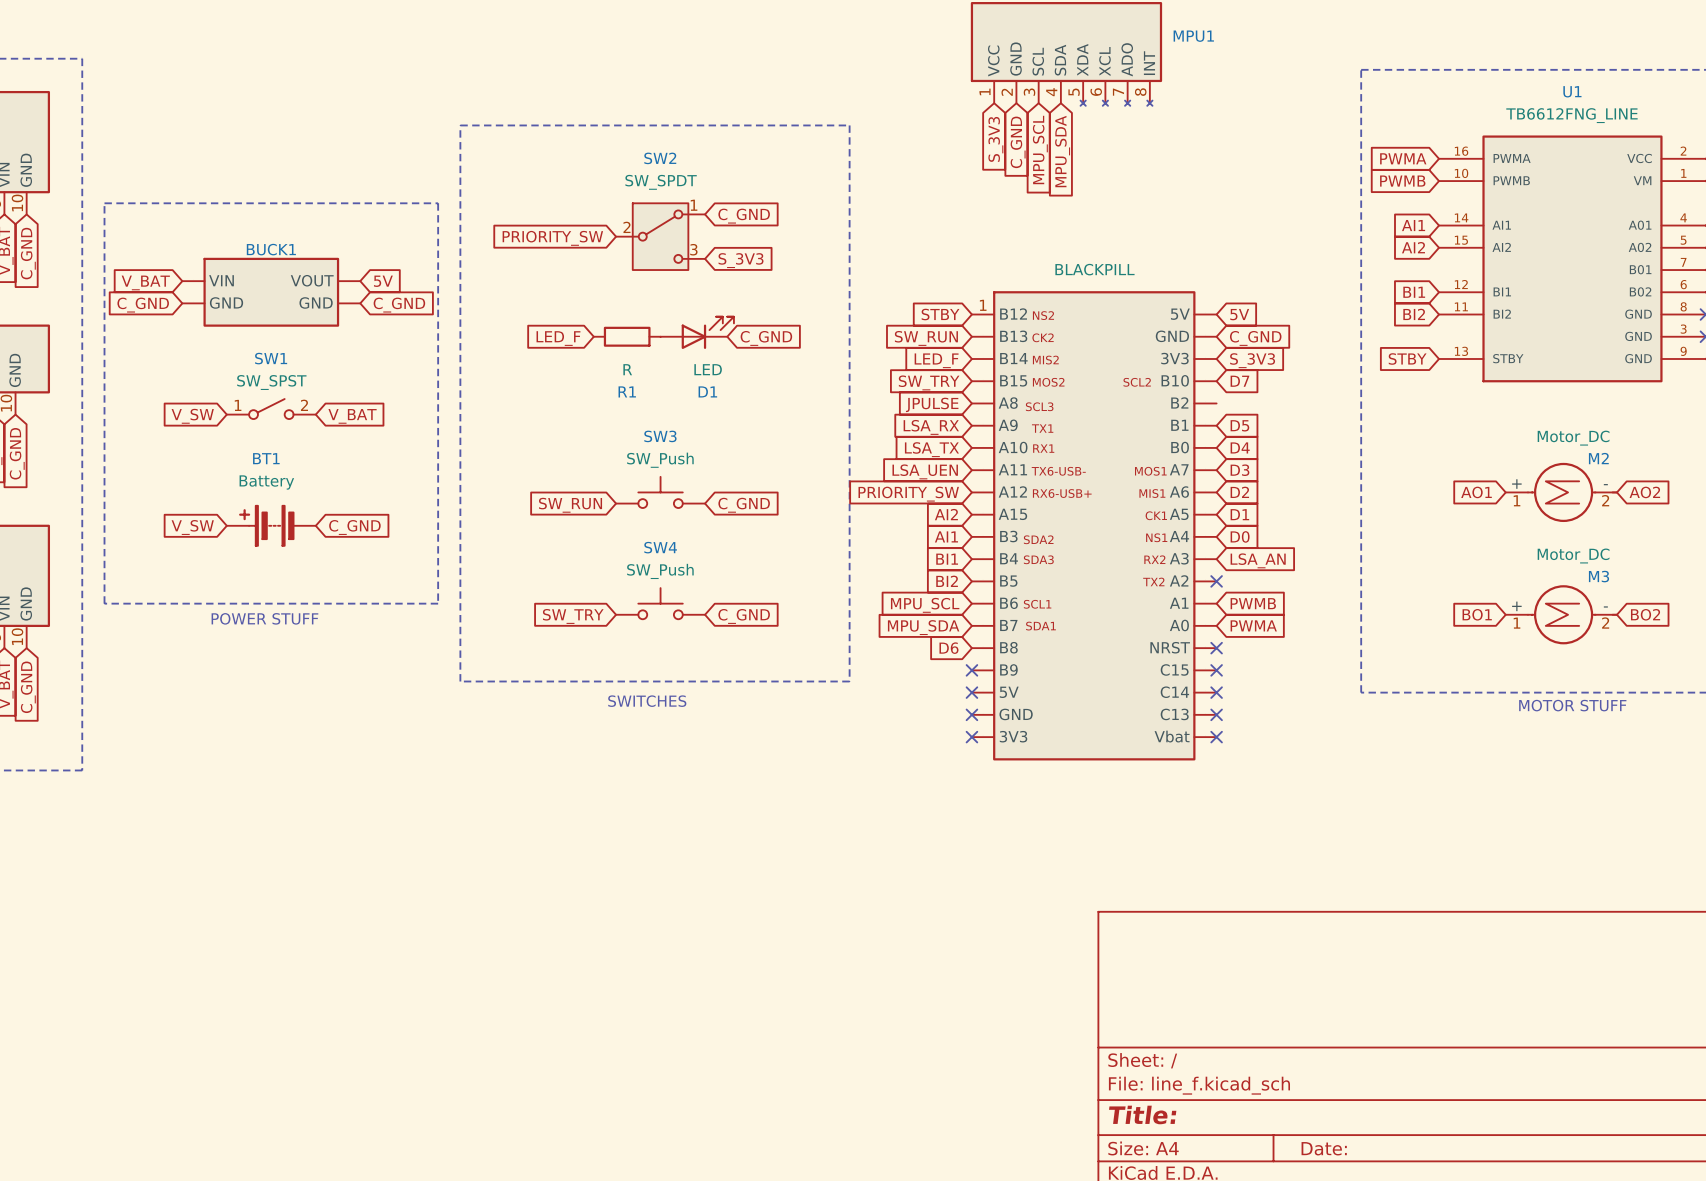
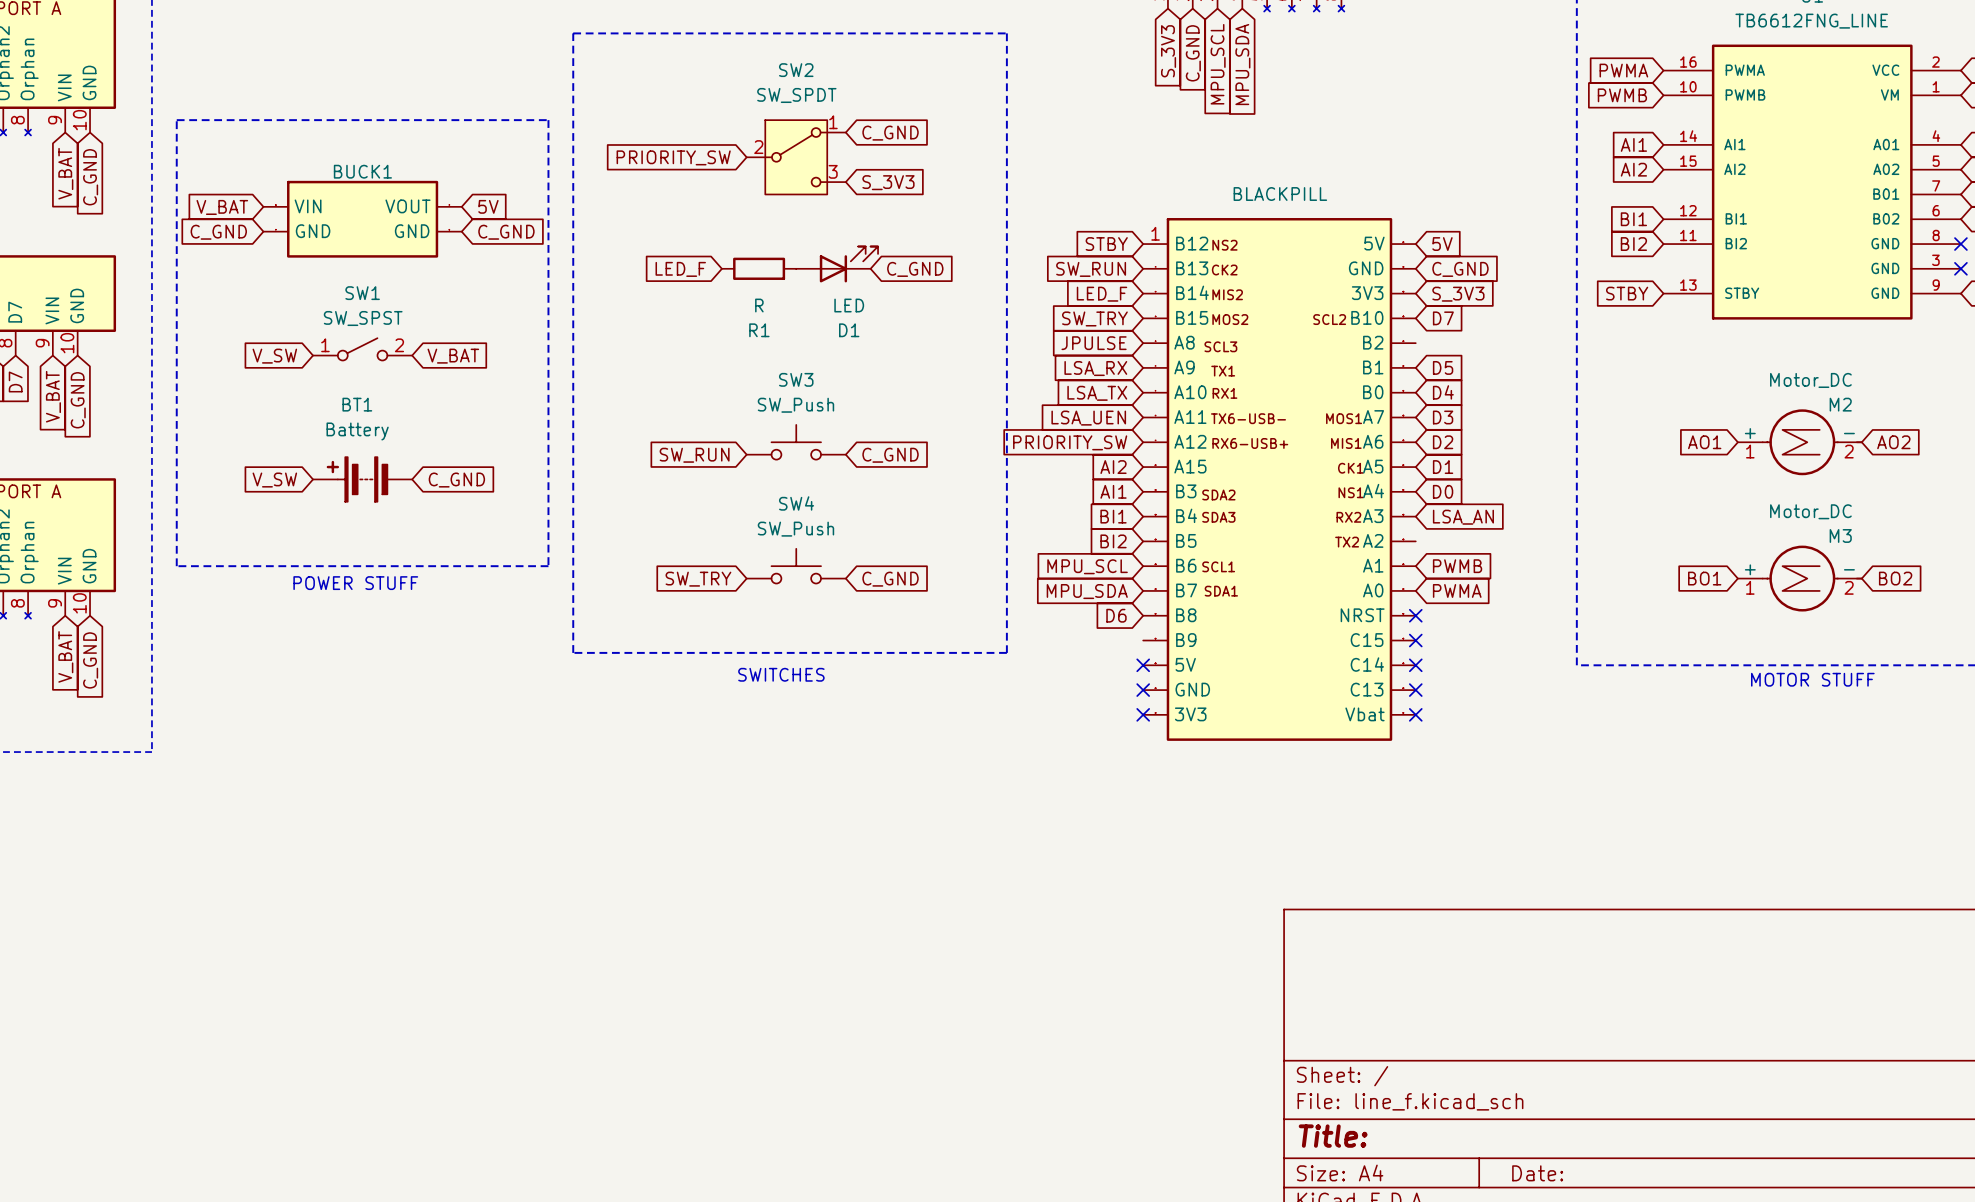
no-connect mark: (1216, 581) -> none
no-connect mark: (971, 670) -> none

